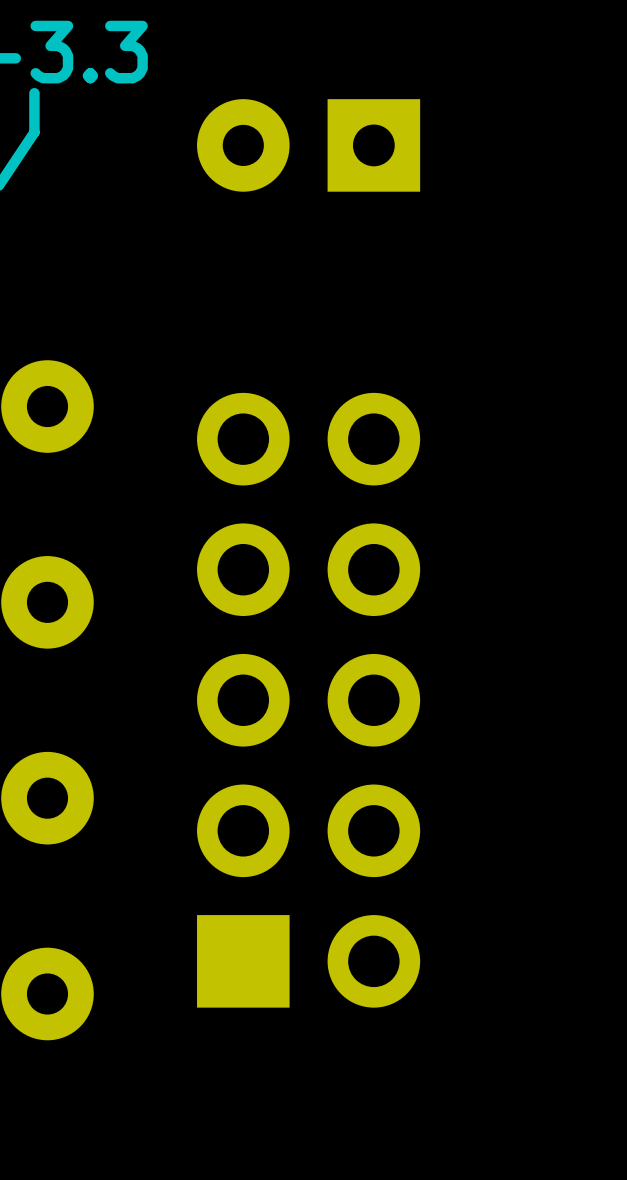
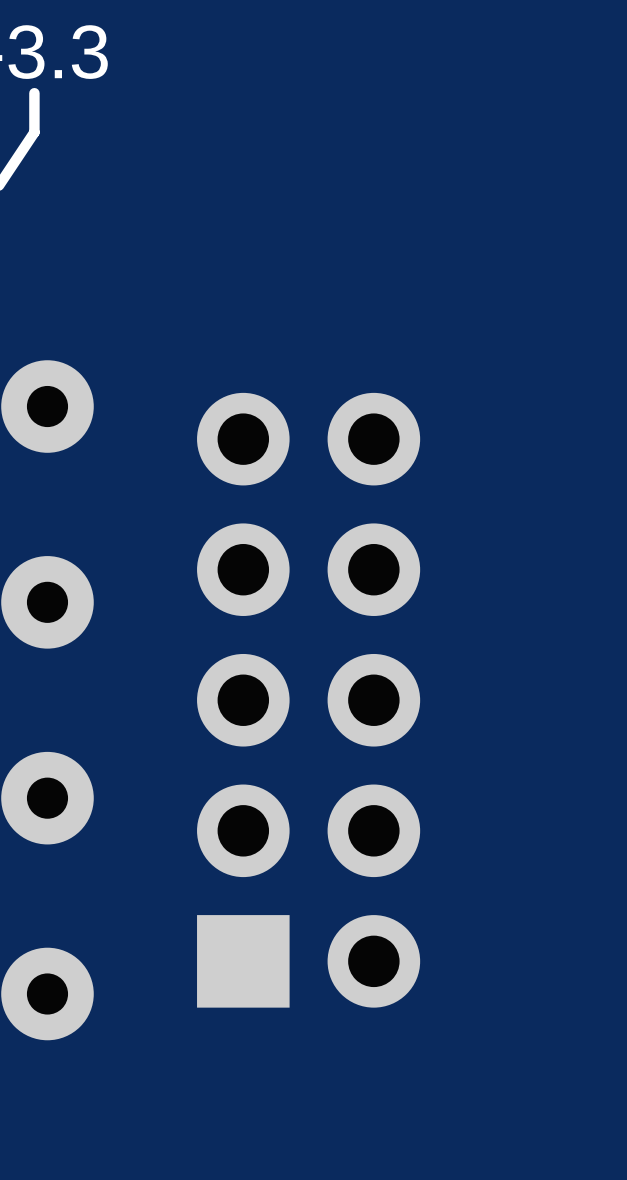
part: (308, 145) -> none

